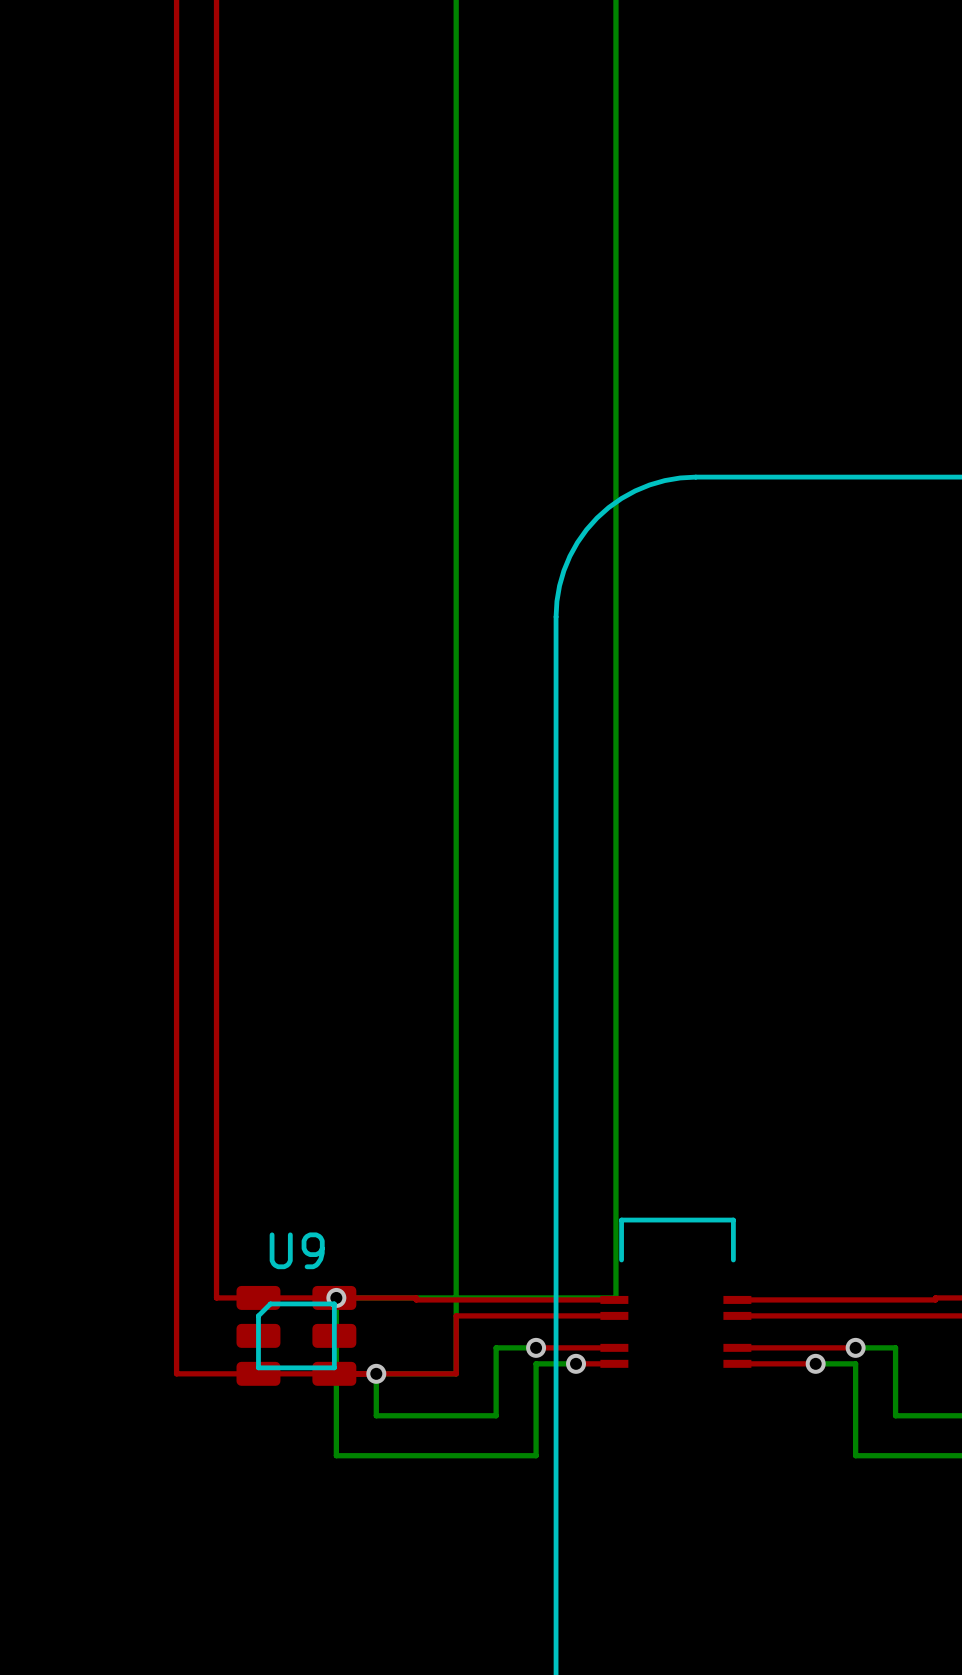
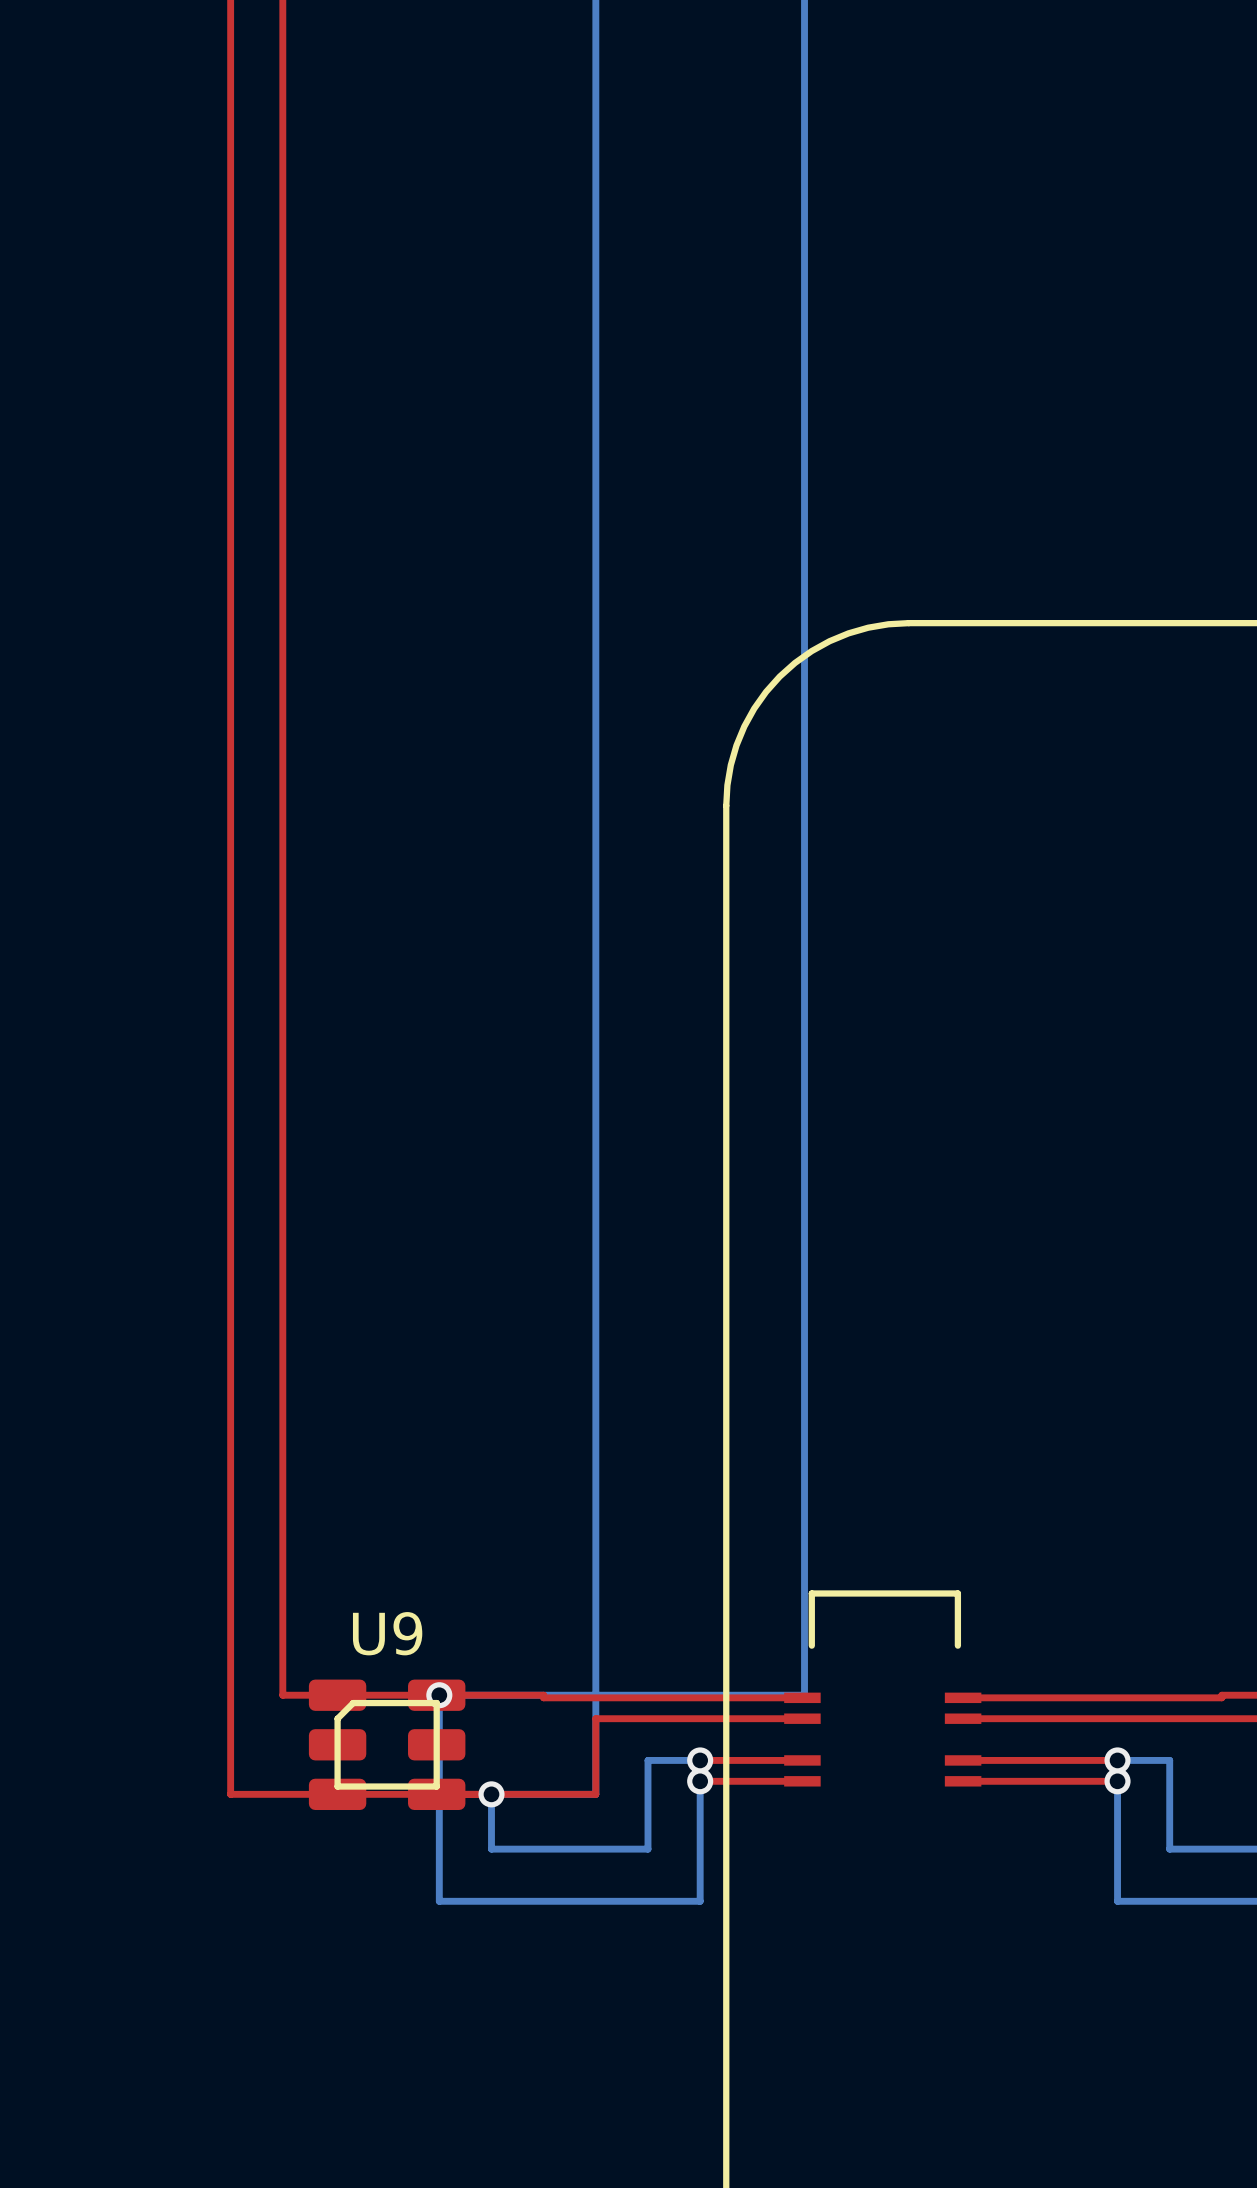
top track: none -> (700, 1781) (752, 1781)
bottom track: (536, 1363) (576, 1363) -> none
via position: (576, 1363) -> (700, 1781)
top track: none -> (1065, 1781) (1117, 1781)
bottom track: (815, 1363) (855, 1363) -> none
via position: (815, 1363) -> (1117, 1781)

